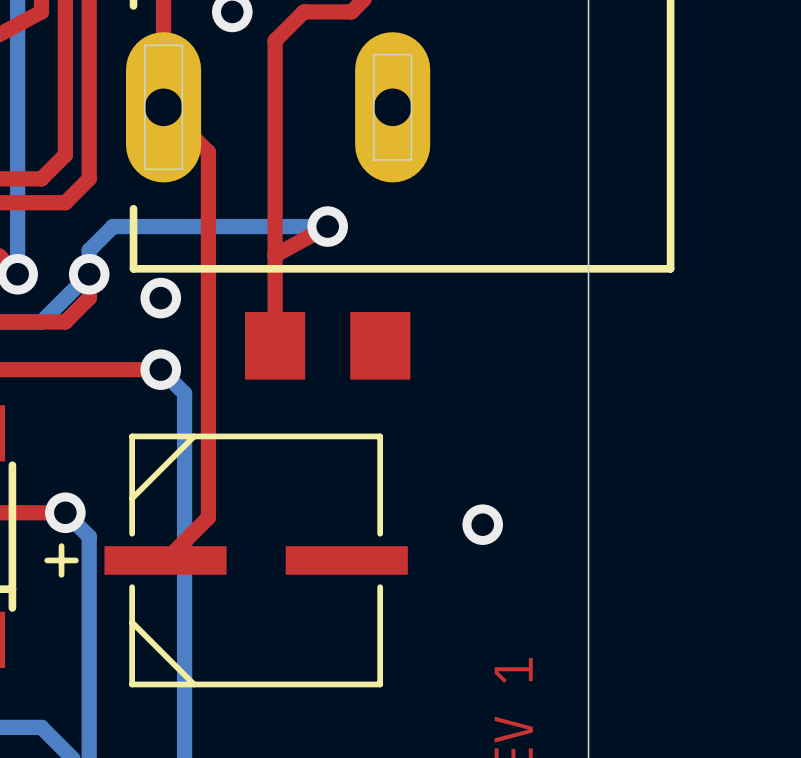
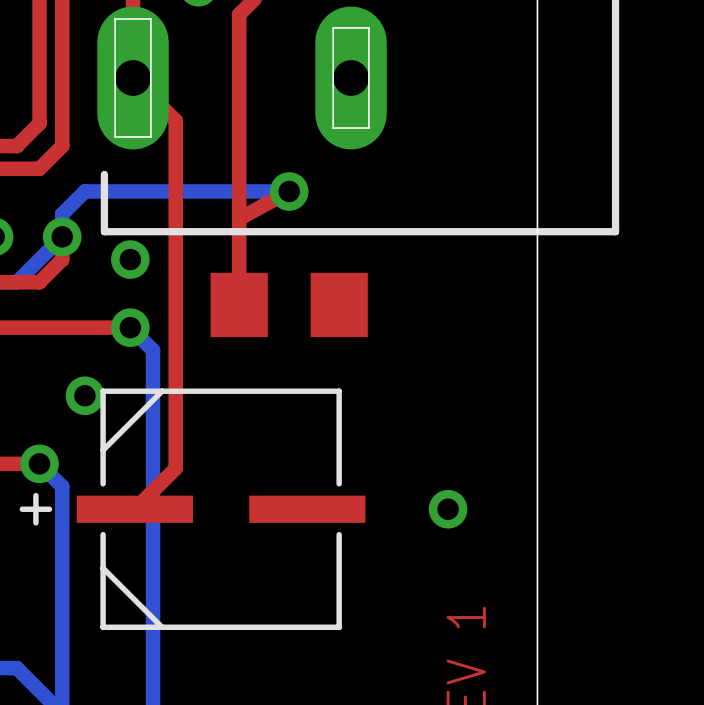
via: none -> (84, 395)
via position: (482, 524) -> (448, 509)

